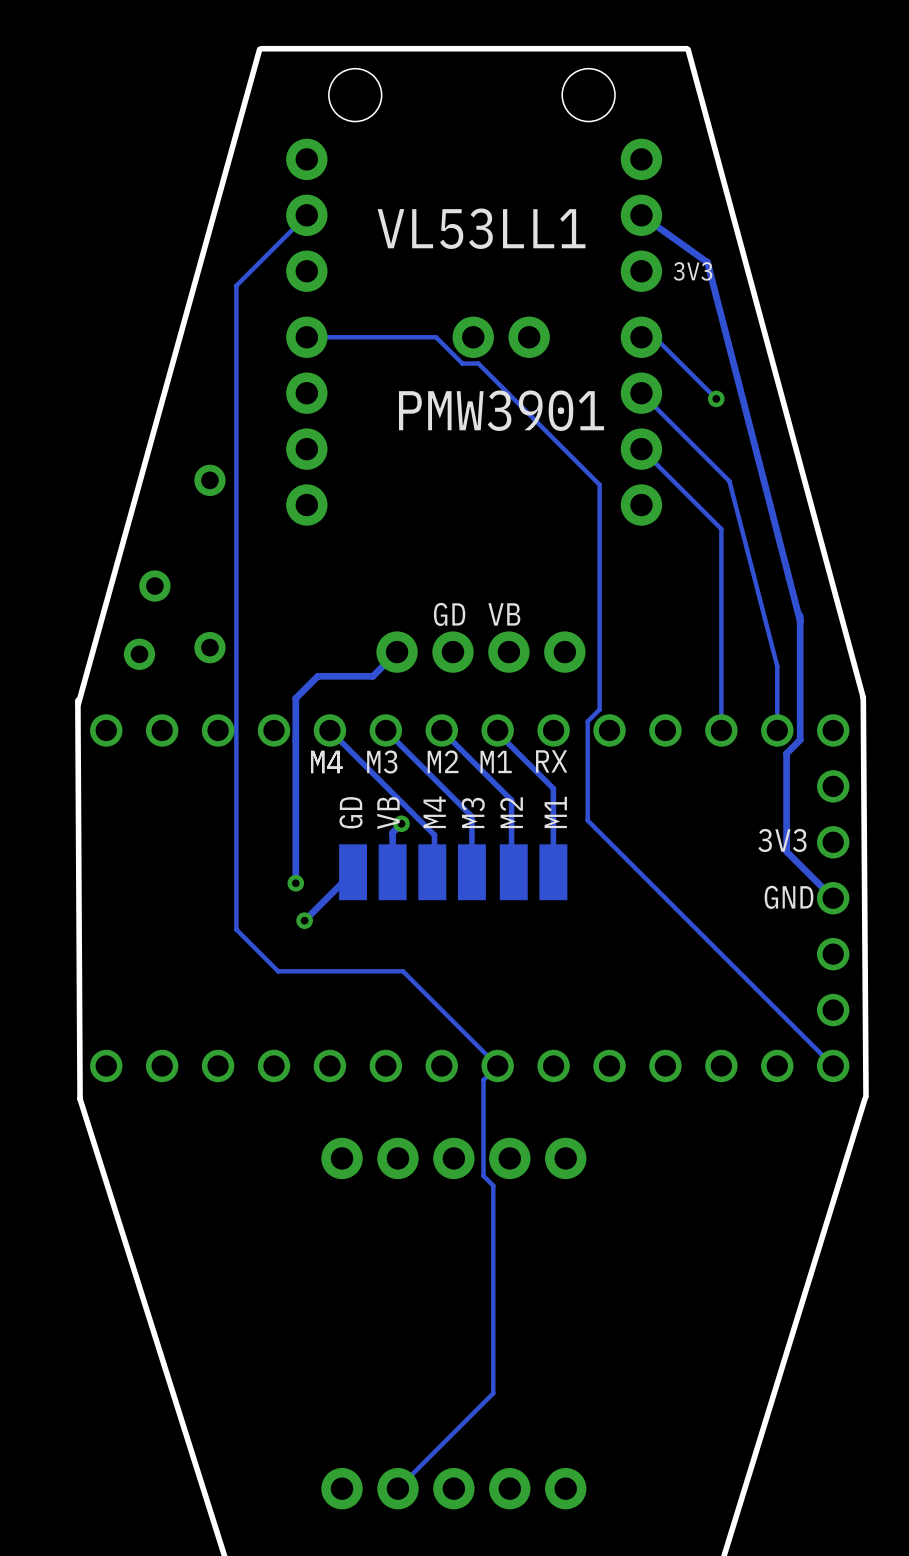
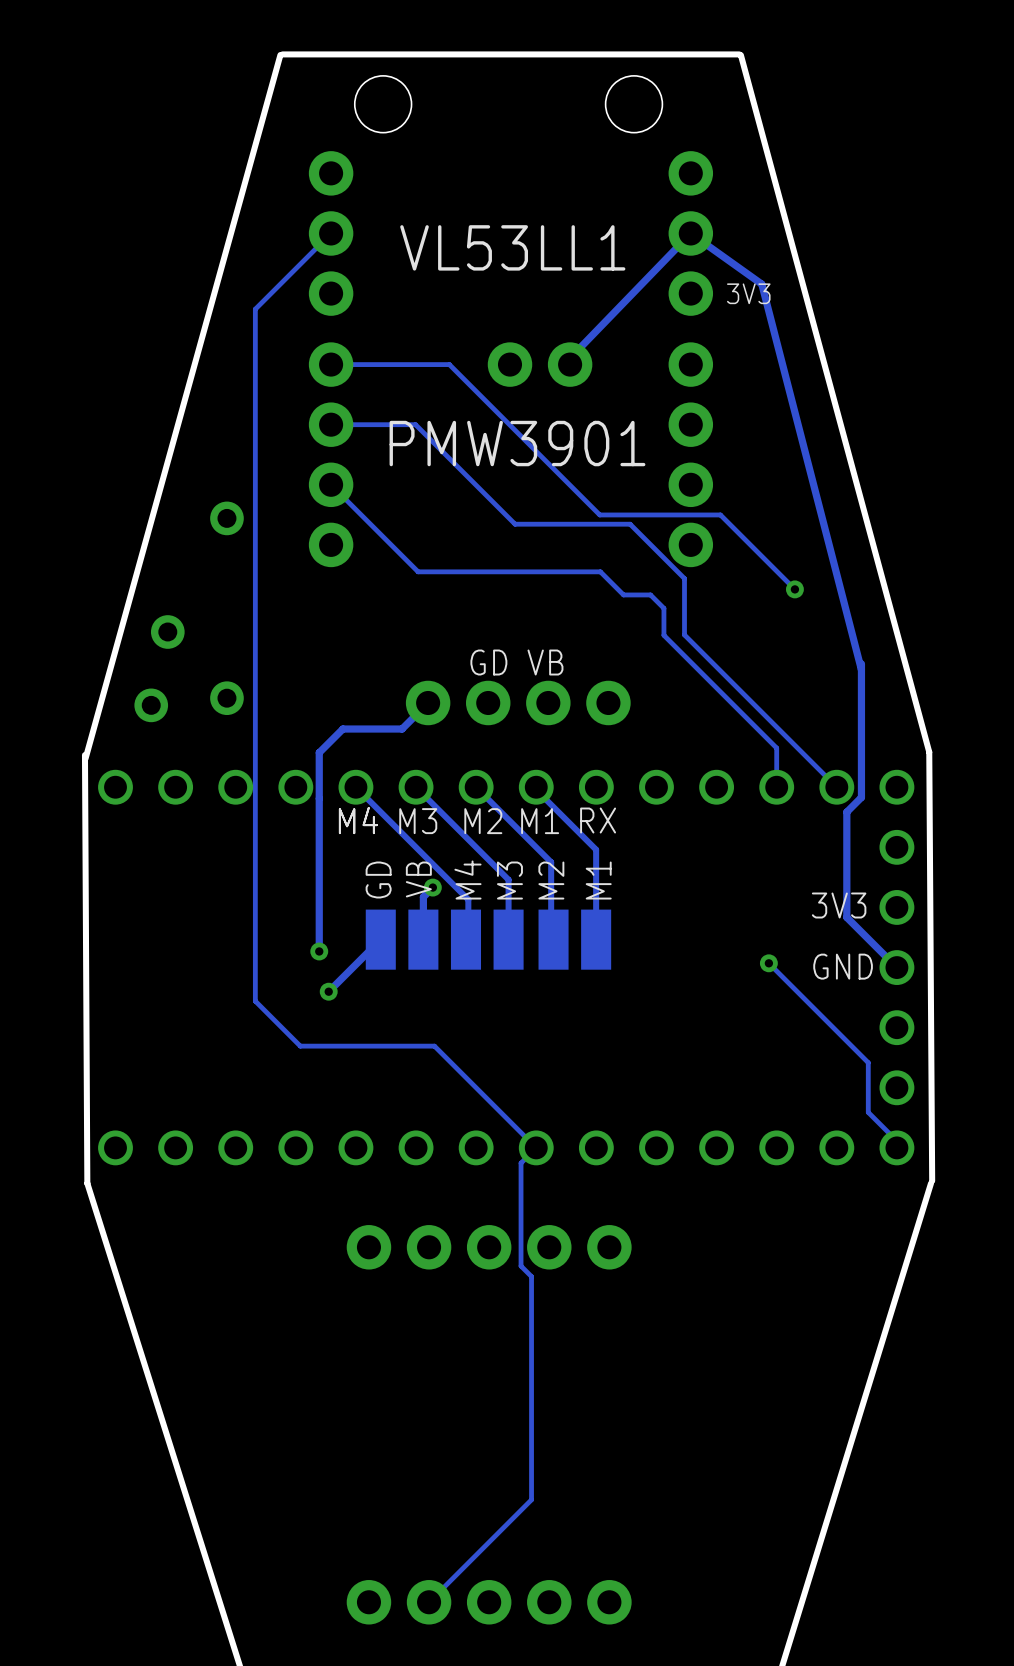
track: none -> (690, 233) (563, 364)
track: (416, 337) (436, 337) (462, 363) (478, 363) (599, 484) (599, 709) (587, 721) (587, 820) (833, 1065) -> (449, 364) (599, 514) (720, 514) (794, 589)
track: (641, 337) (654, 337) (716, 398) -> none
track: (641, 393) (729, 481) (777, 666) (777, 730) -> (331, 424) (415, 424) (515, 524) (630, 524) (684, 578) (684, 634) (836, 787)
via: (716, 398) -> none
track: (641, 449) (721, 529) (721, 694) -> (331, 484) (418, 571) (600, 571) (623, 594) (650, 594) (663, 608) (663, 635) (776, 748)
via: none -> (794, 589)
track: none -> (768, 963) (868, 1062) (868, 1112) (896, 1141)
via: none -> (768, 963)

